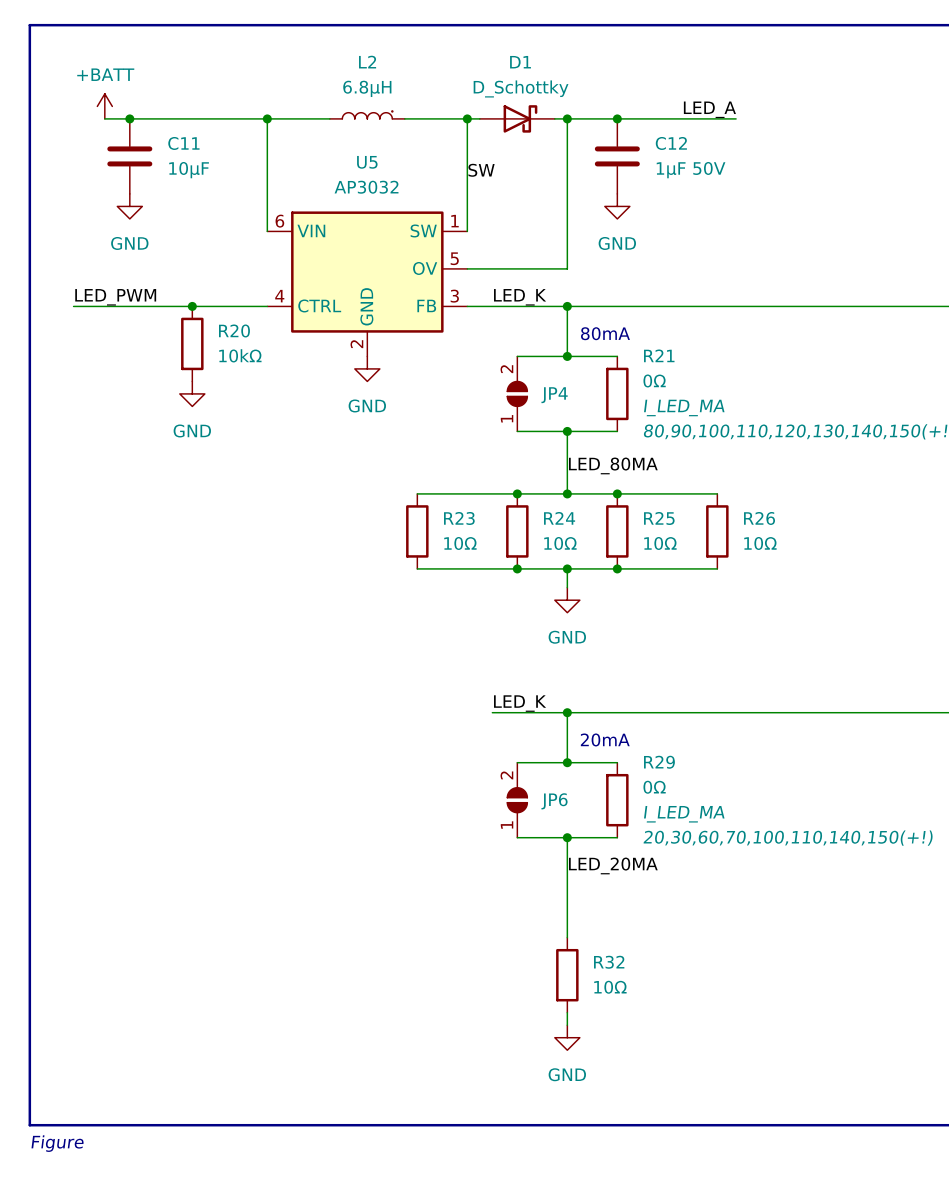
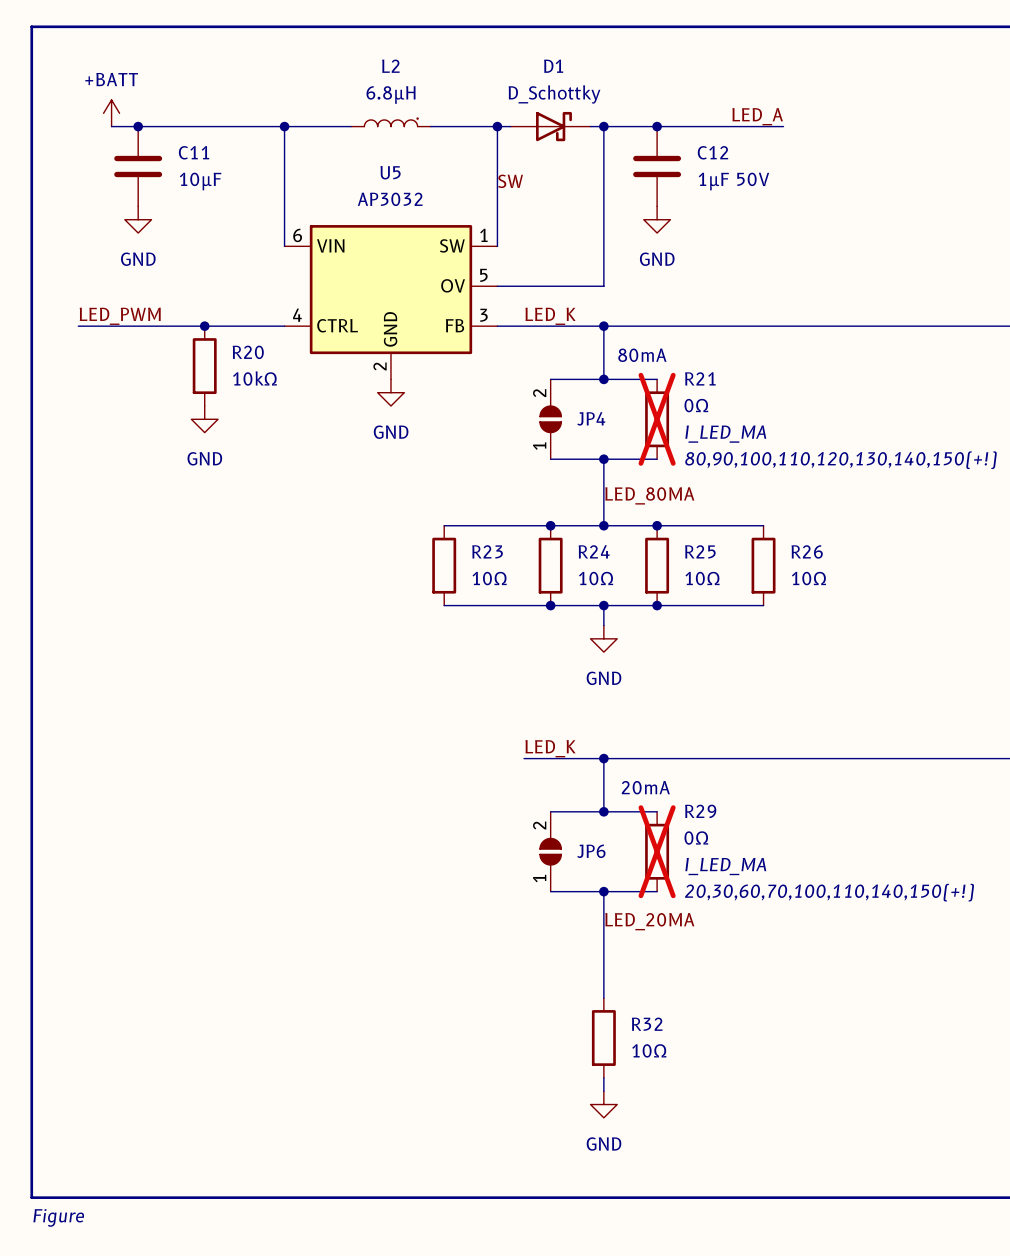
R21 do-not-place cross: none -> (657, 419)
R29 do-not-place cross: none -> (657, 851)

